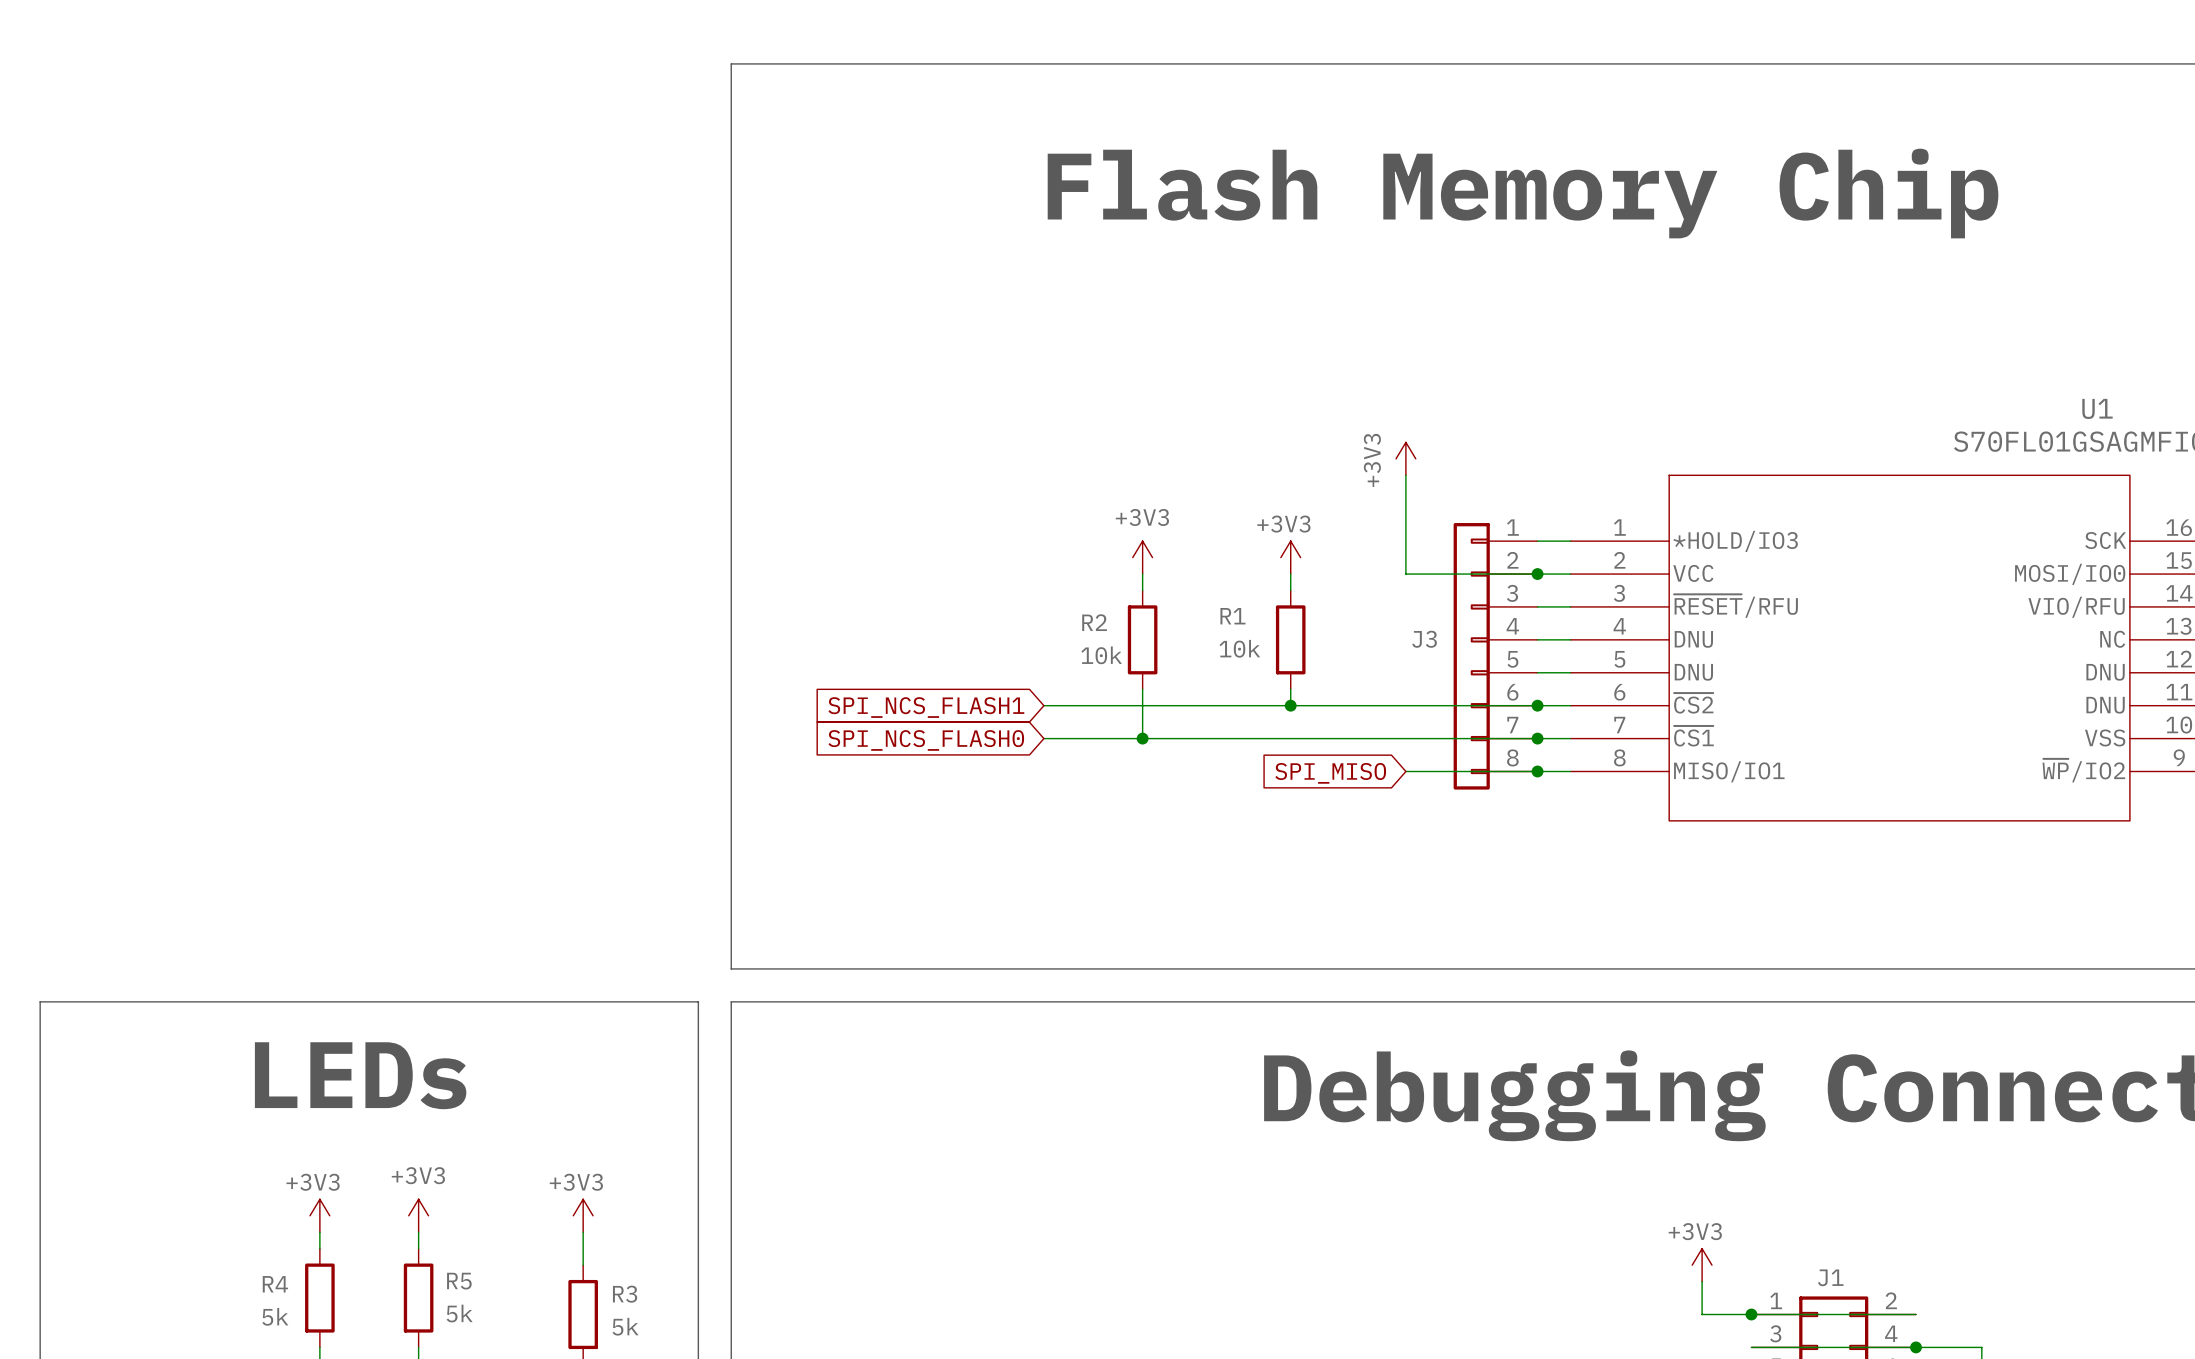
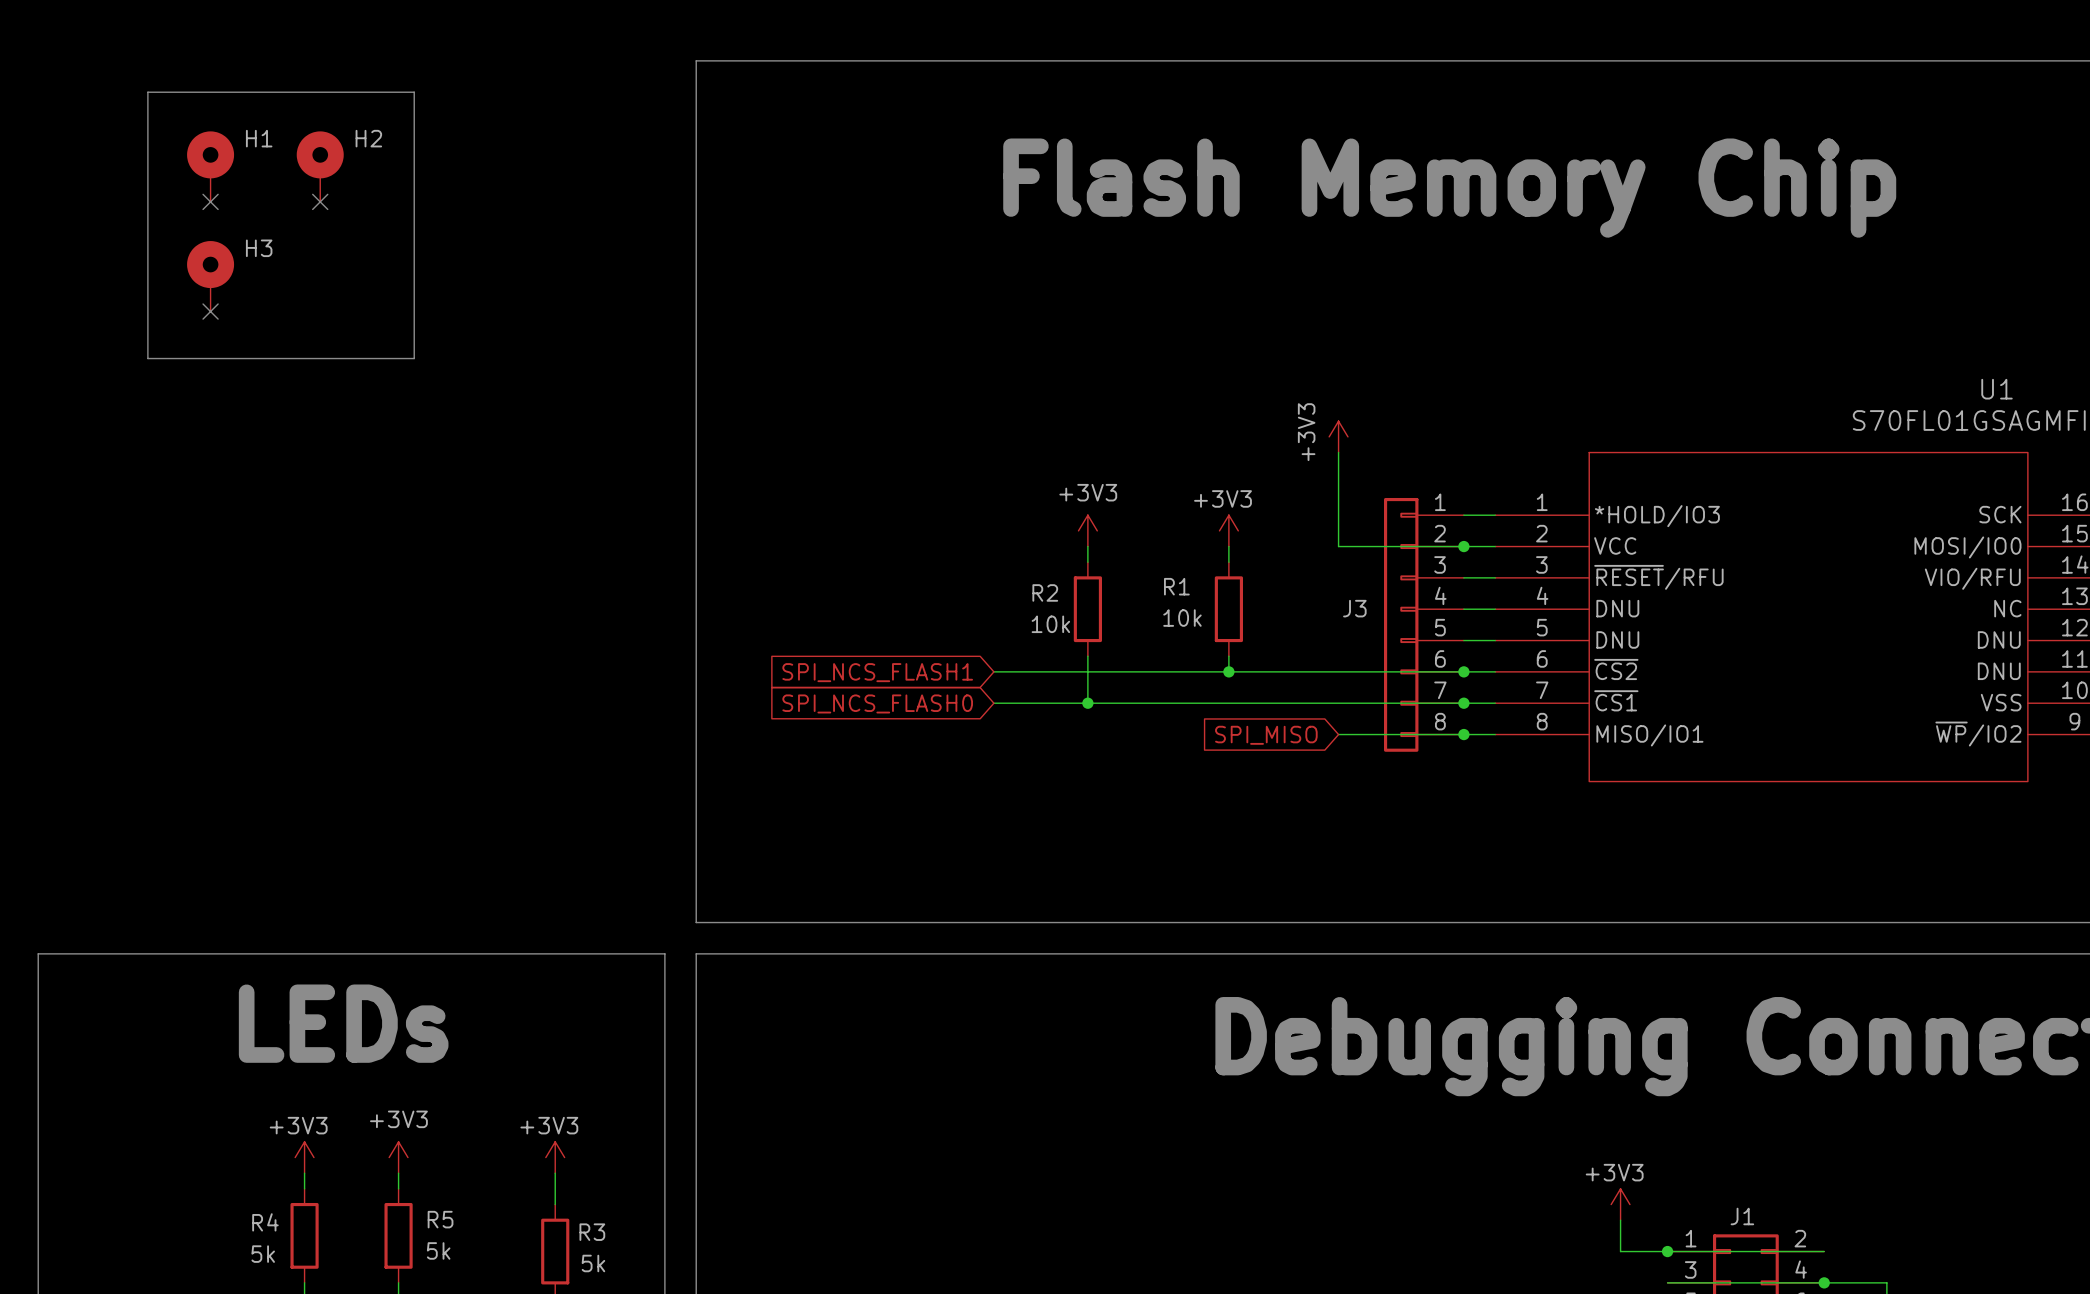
line: none -> (147, 92) (414, 92) (414, 358) (147, 358) (147, 92)
H1: none -> (210, 166)
H2: none -> (320, 166)
no-connect mark: none -> (210, 201)
no-connect mark: none -> (320, 201)
H3: none -> (210, 276)
no-connect mark: none -> (210, 311)

